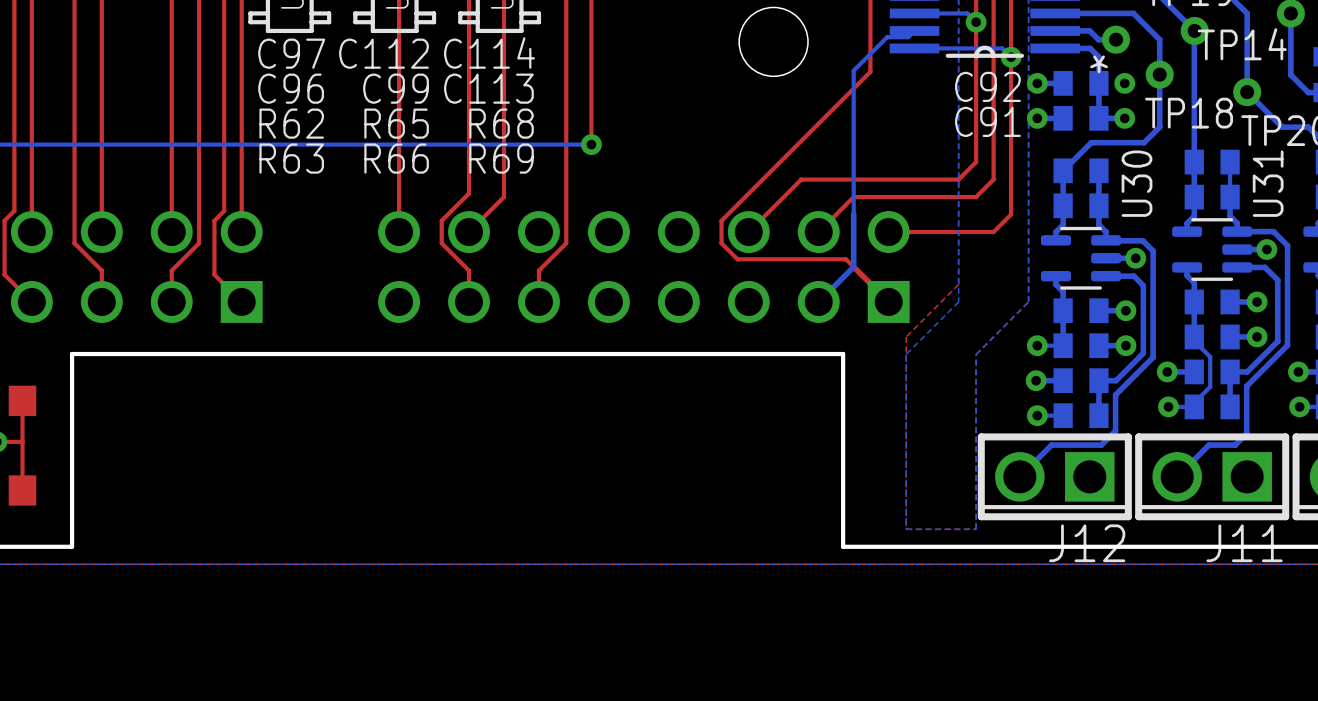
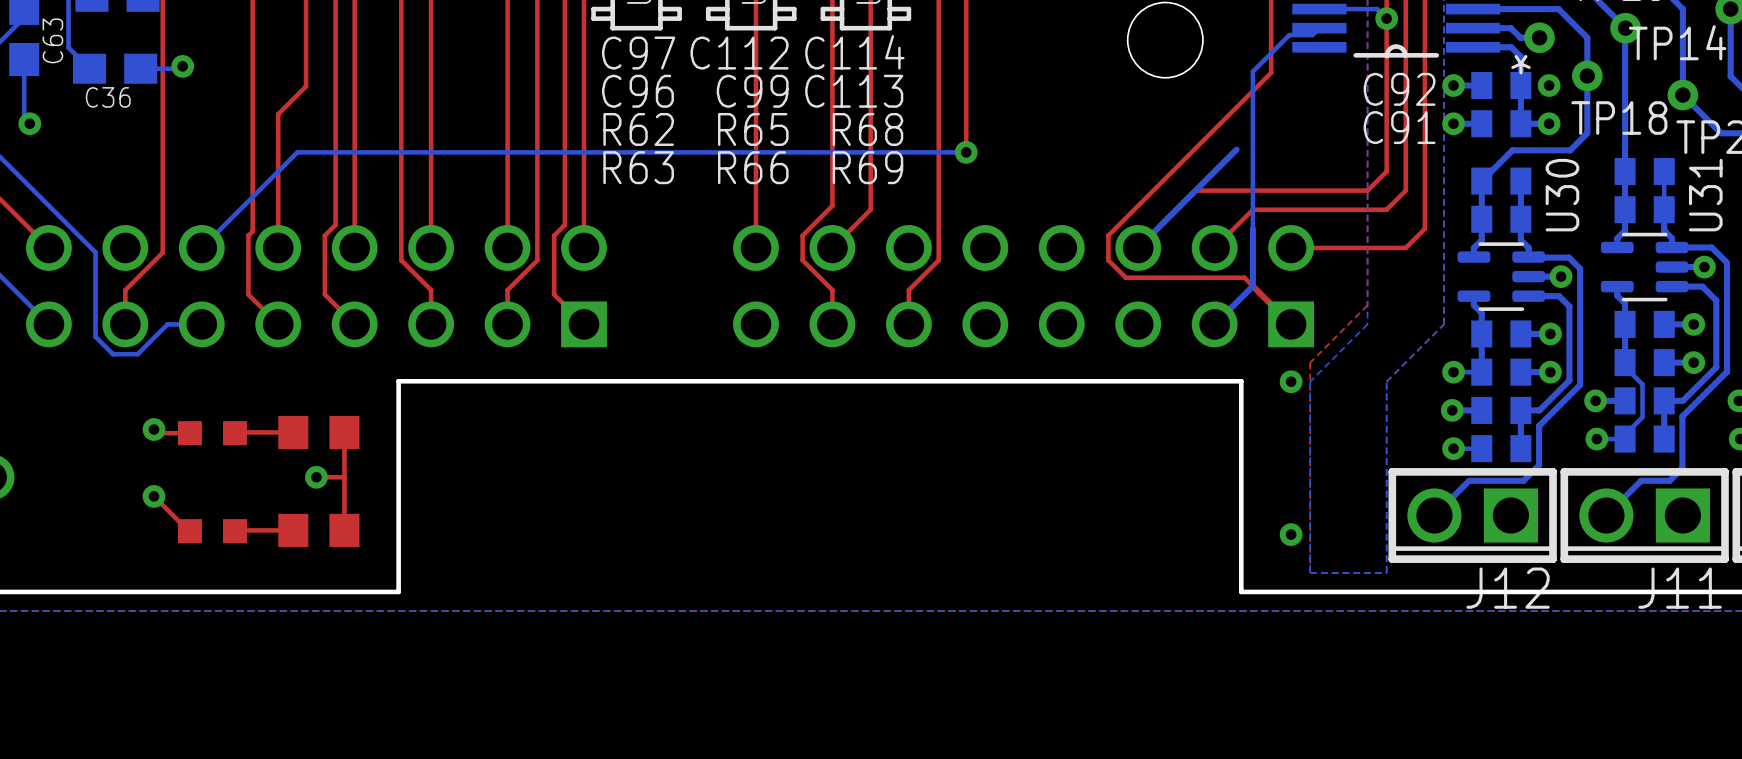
bottom track: (932, 48) (1002, 48) (1011, 57) -> none
via: (1011, 57) -> none
bottom track: none -> (1236, 149) (1138, 247)
via: none -> (1291, 381)
via: none -> (1291, 534)

